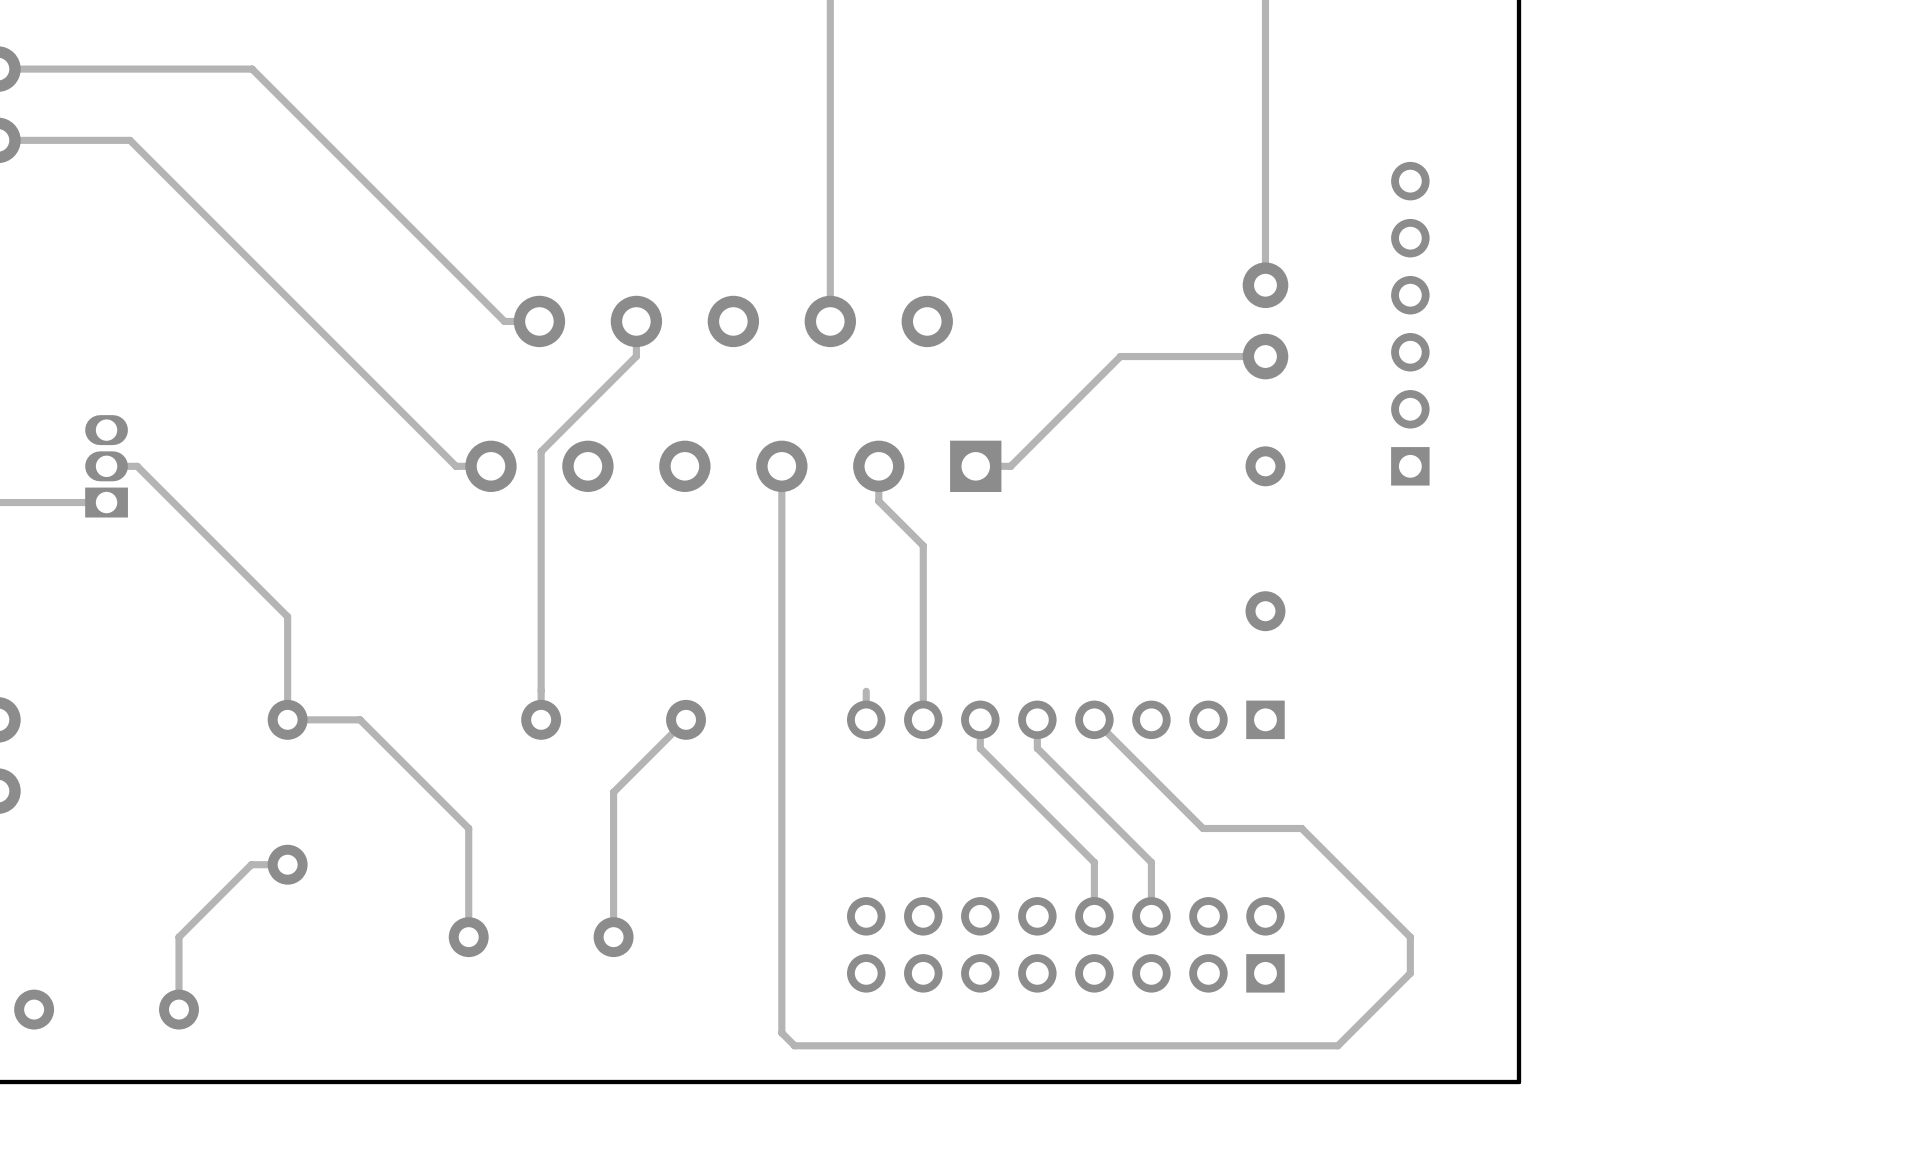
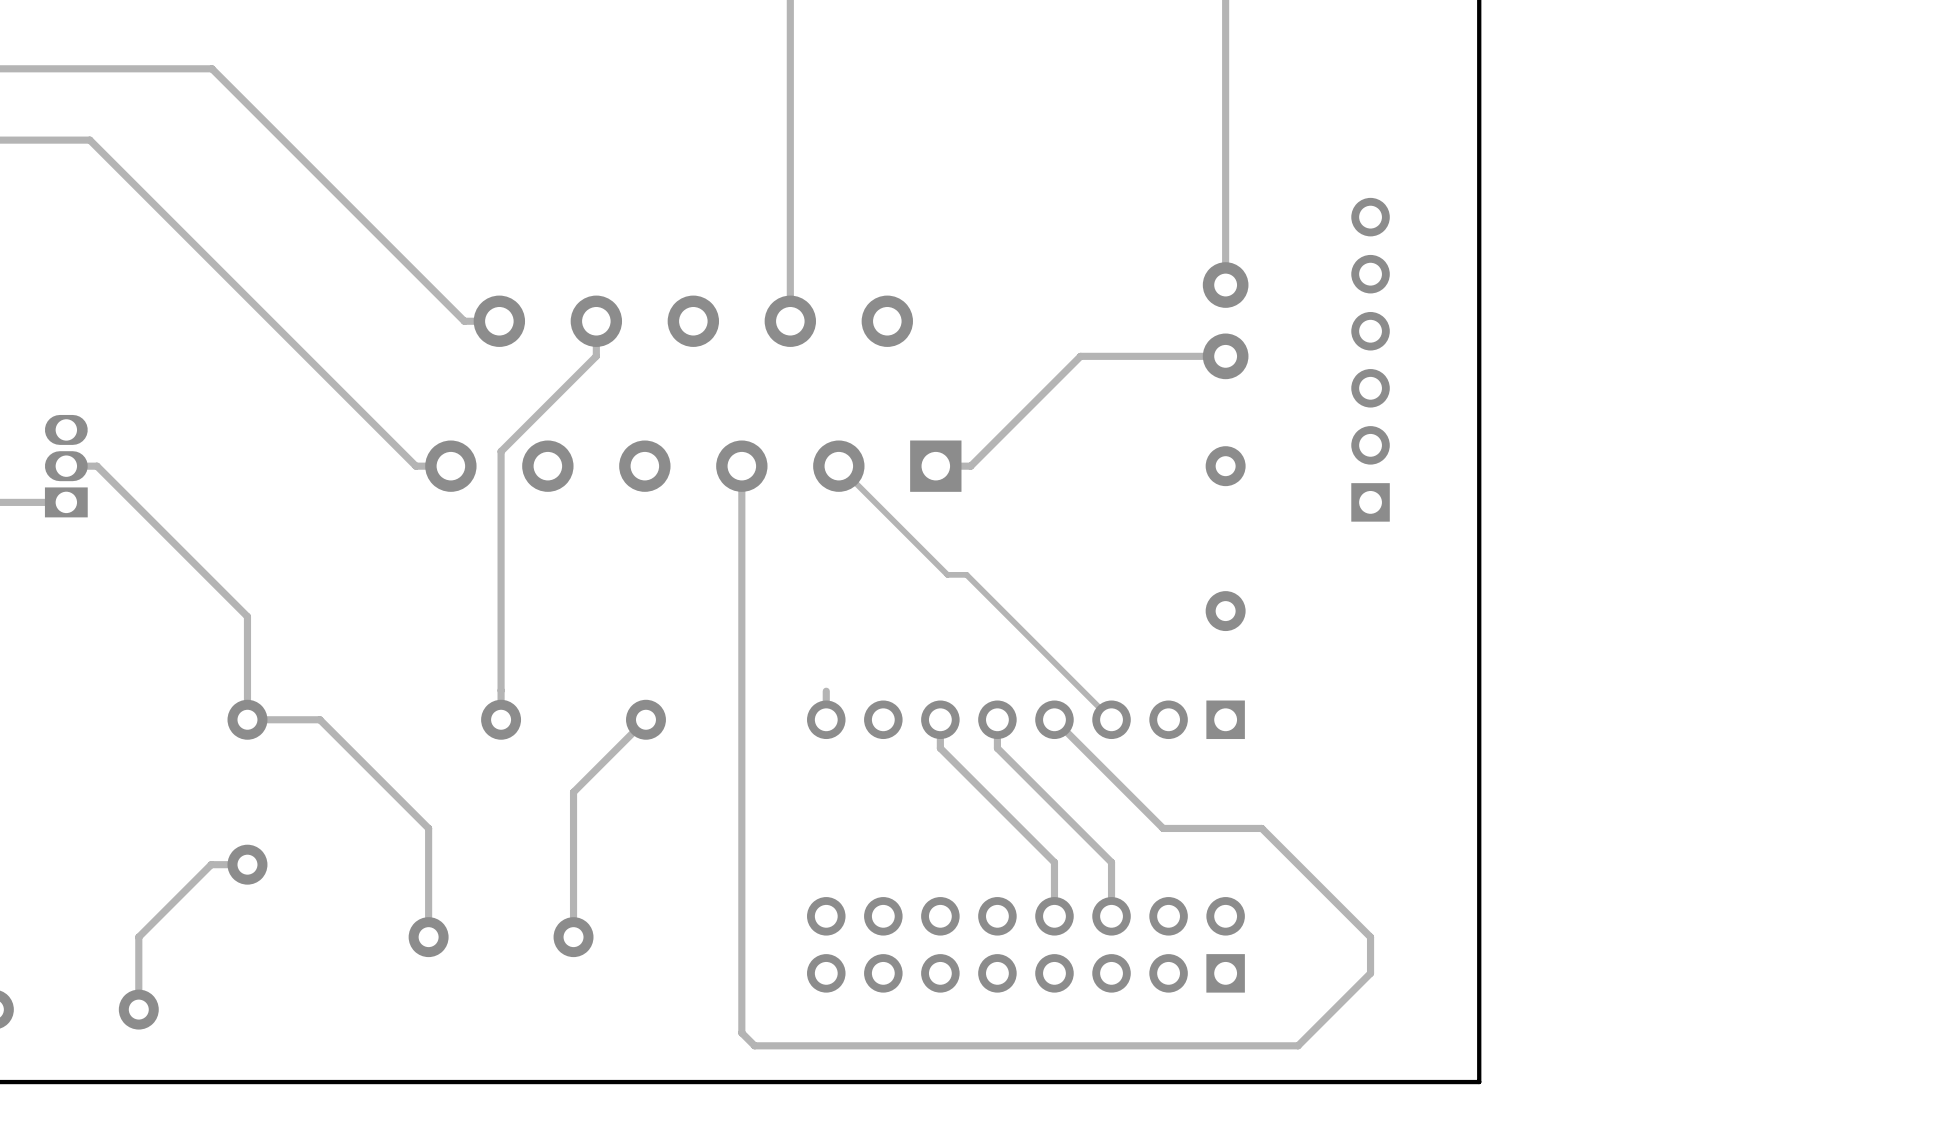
part position: (1410, 323) -> (1370, 359)
track: (878, 466) (878, 501) (923, 545) (923, 719) -> (838, 466) (947, 574) (966, 574) (1111, 719)

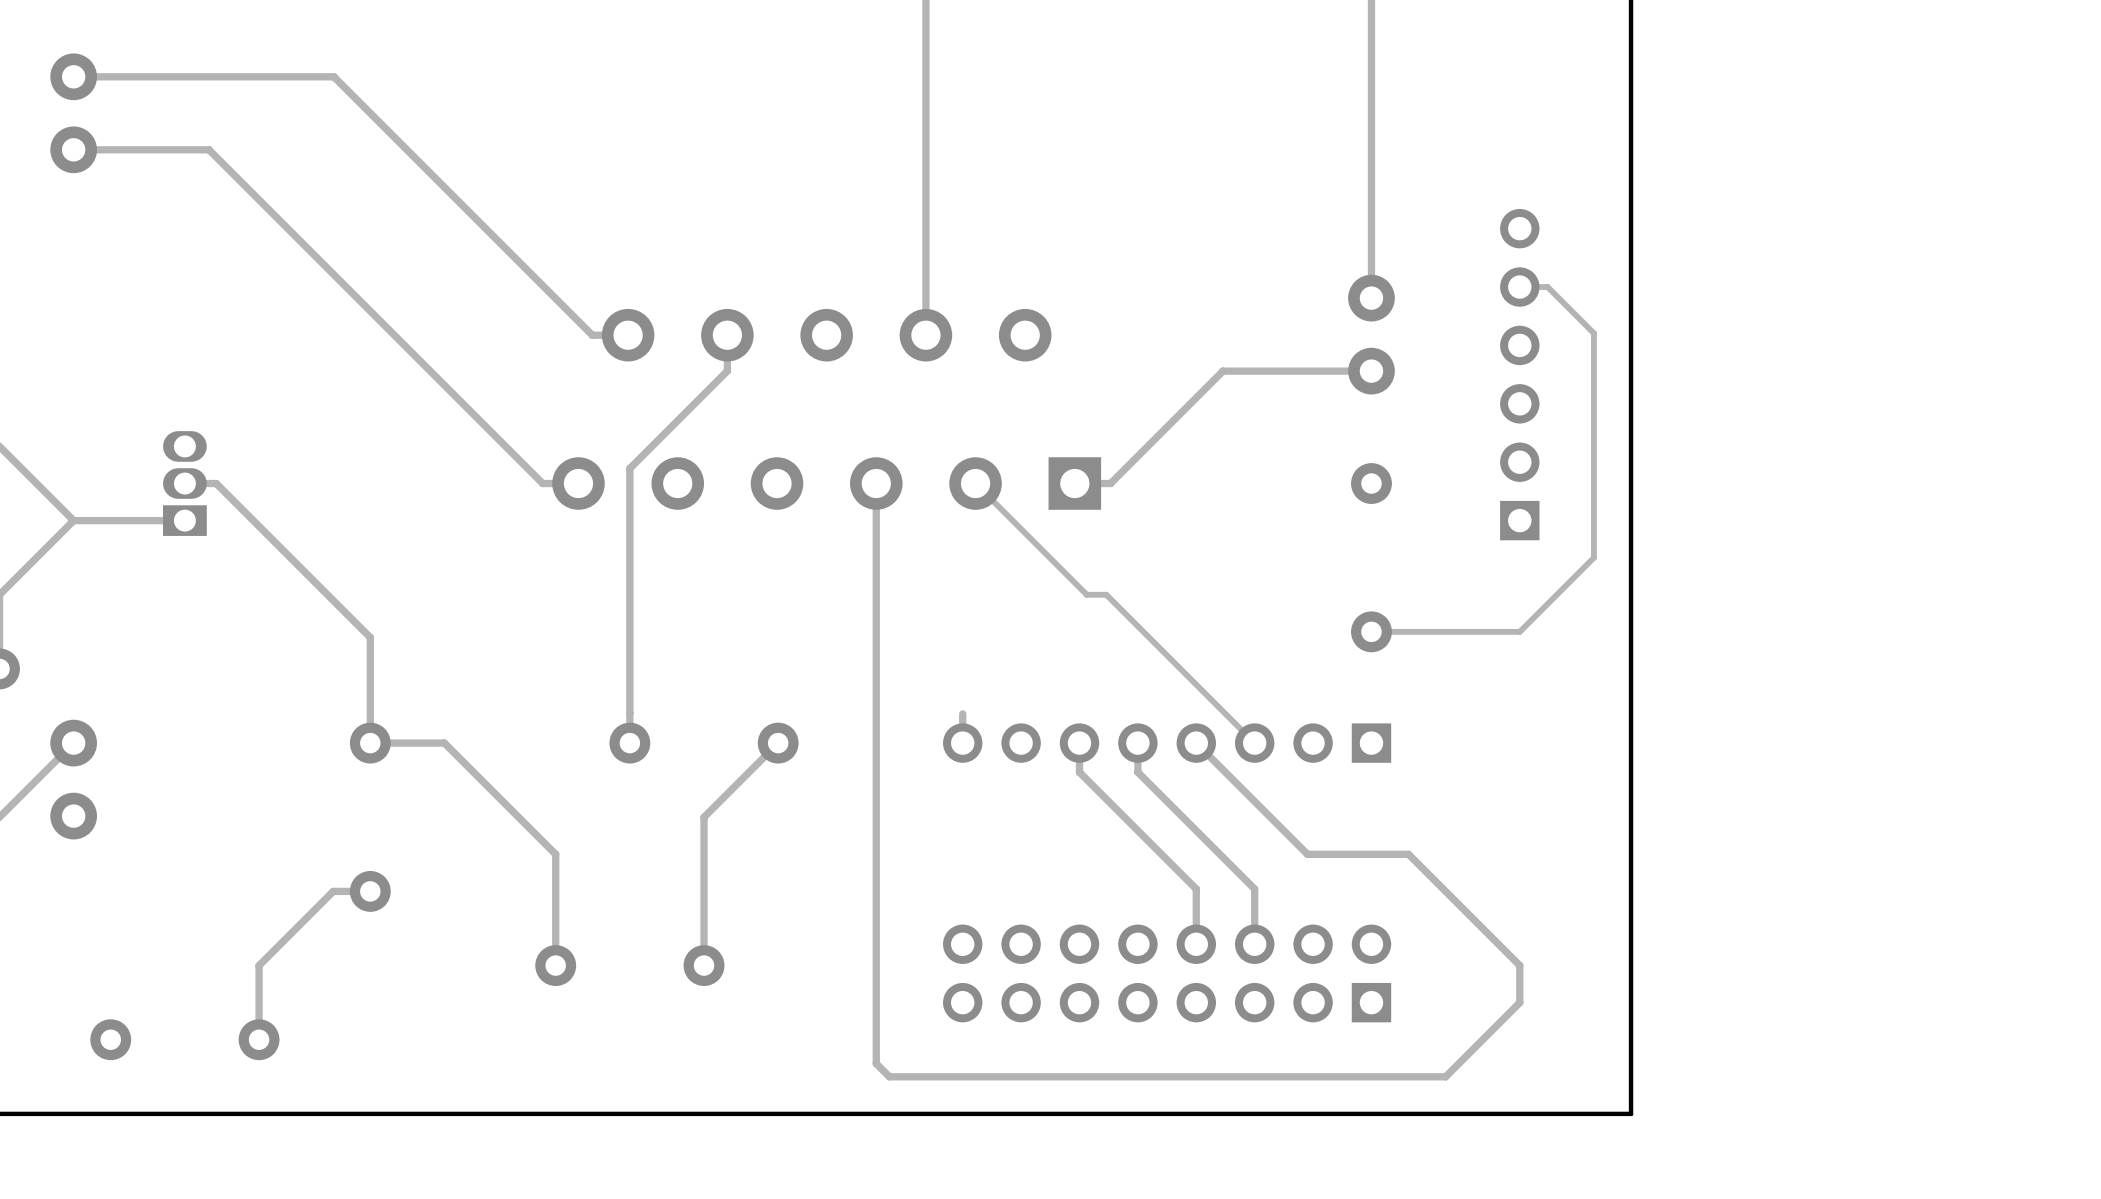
track: none -> (1519, 287) (1547, 287) (1593, 333) (1593, 557) (1519, 631) (1371, 631)

